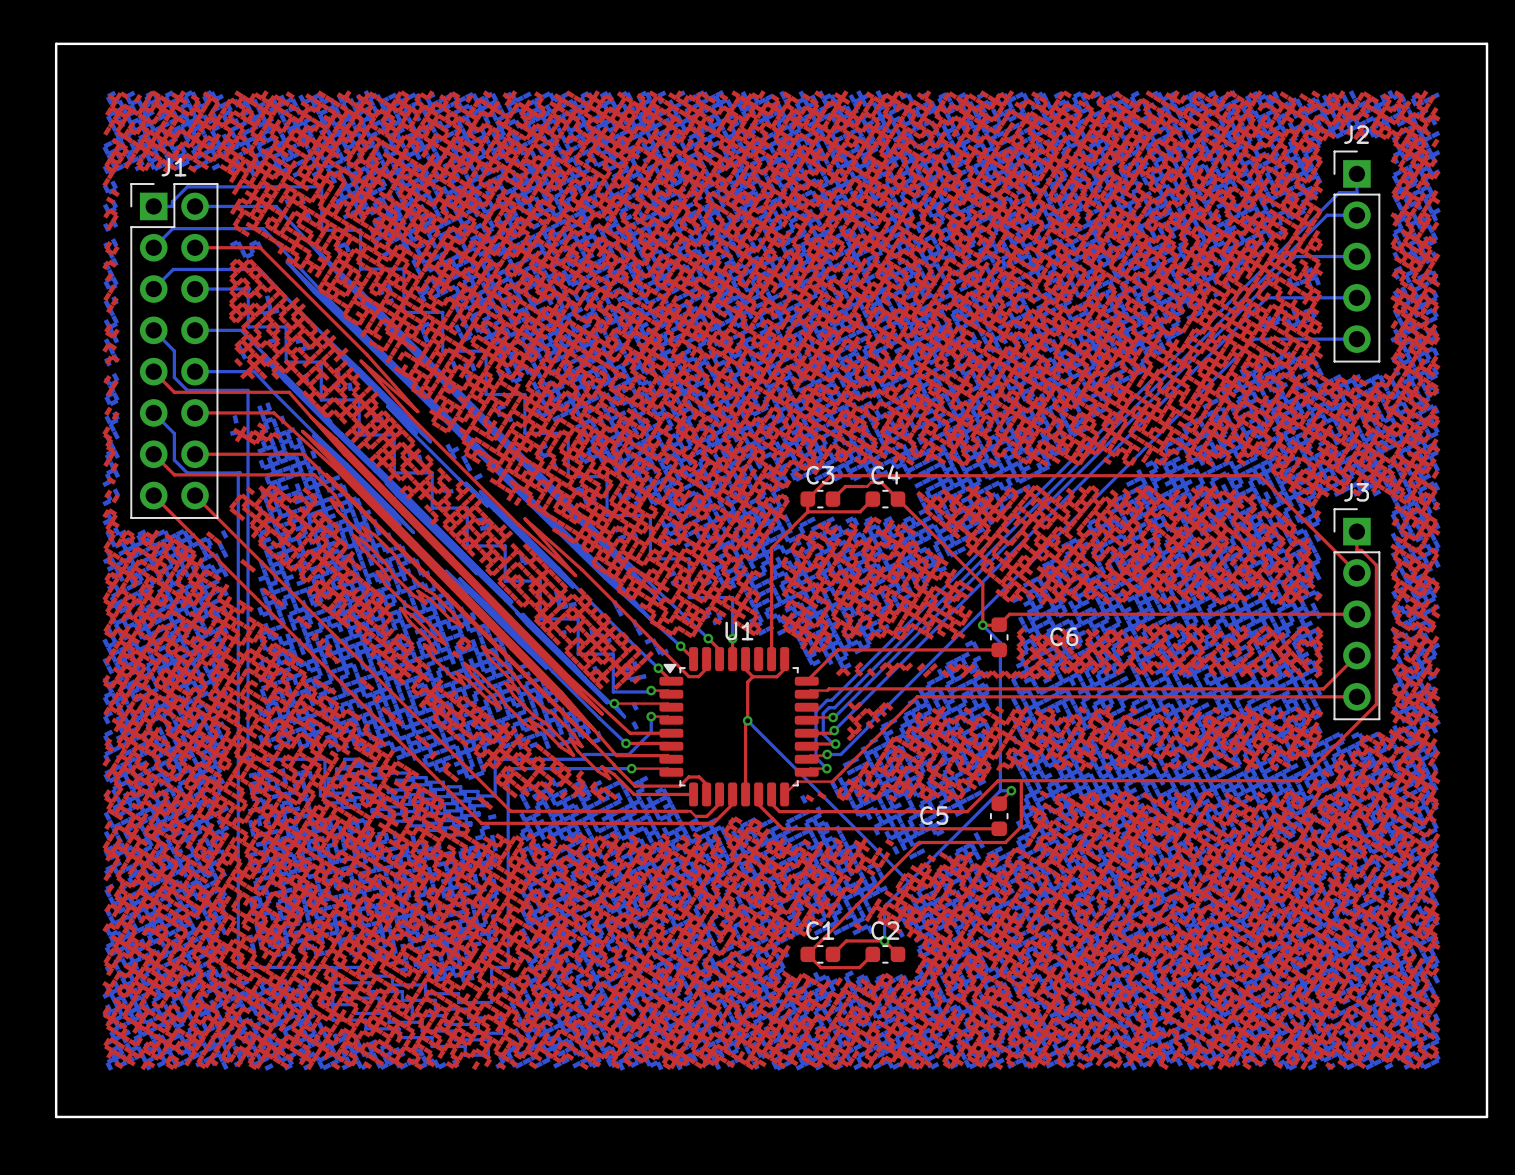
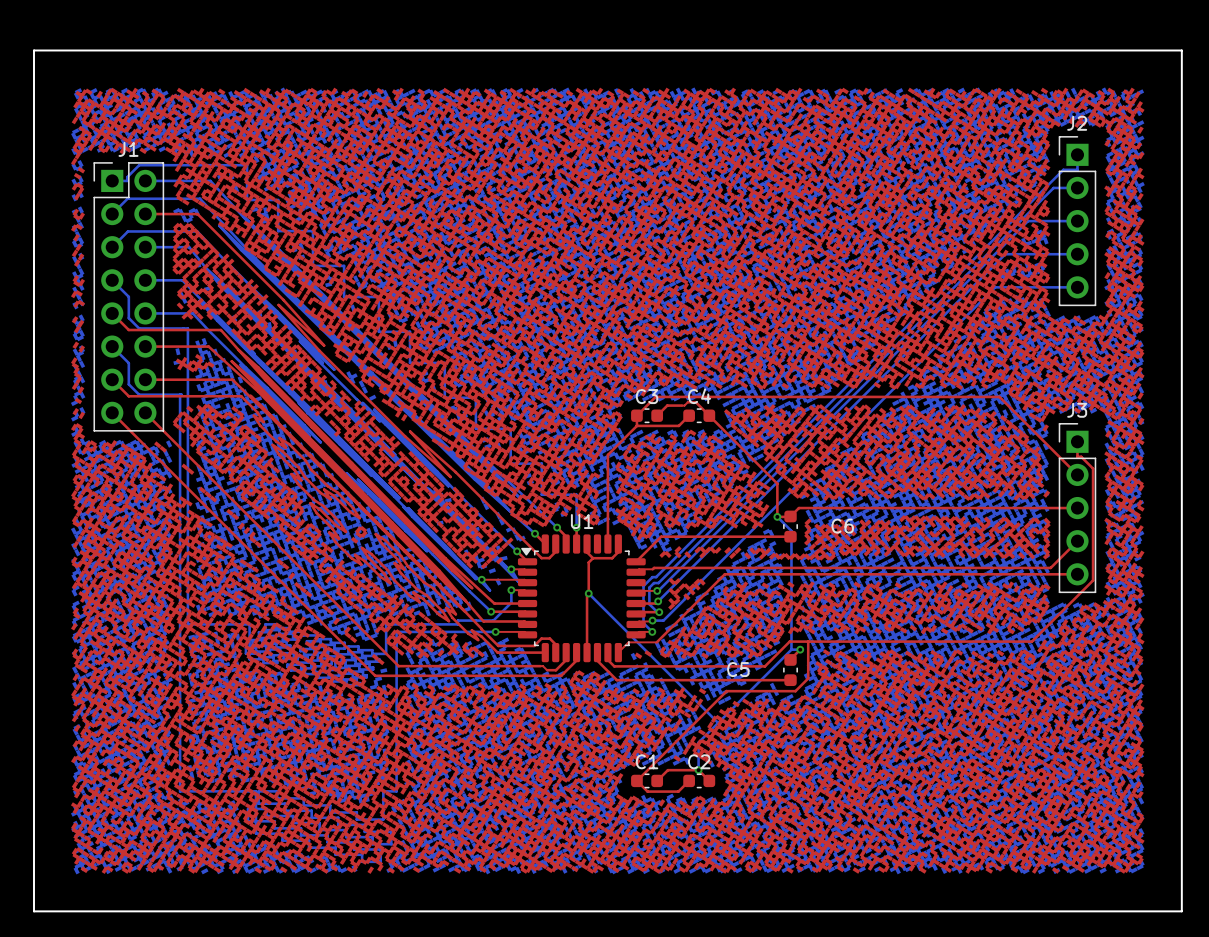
drawing: none -> [251, 207, 270, 225]
drawing: [335, 242, 351, 256] -> none
bottom track: (248, 289) (248, 326) (286, 326) (286, 362) (321, 362) (321, 399) (359, 399) (359, 435) (394, 435) (394, 472) (432, 472) (432, 508) (467, 508) (467, 545) (505, 545) (505, 581) (540, 581) (540, 618) (578, 618) (578, 654) (613, 654) (613, 691) (651, 690) -> (189, 247) (219, 284) (263, 328) (230, 294) (240, 303) (330, 397) (419, 484) (341, 406) (407, 469) (340, 401) (329, 391) (363, 425) (207, 269) (350, 410) (317, 376) (328, 386) (506, 567) (430, 494) (518, 582) (511, 569)
drawing: [262, 295, 280, 317] -> none
drawing: [413, 321, 431, 344] -> none
drawing: none -> [323, 275, 334, 288]
drawing: [463, 361, 477, 383] -> none
drawing: [496, 403, 514, 423] -> none
drawing: none -> [392, 340, 398, 348]
drawing: [477, 516, 491, 532] -> none
drawing: [519, 554, 532, 566] -> none
drawing: none -> [473, 554, 497, 574]
drawing: [631, 720, 639, 731] -> none

